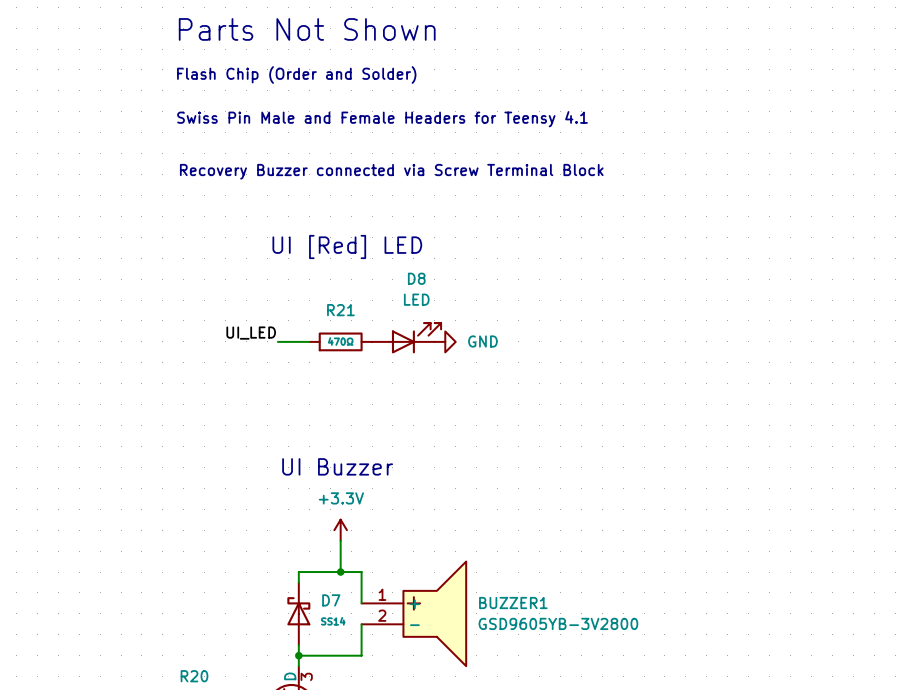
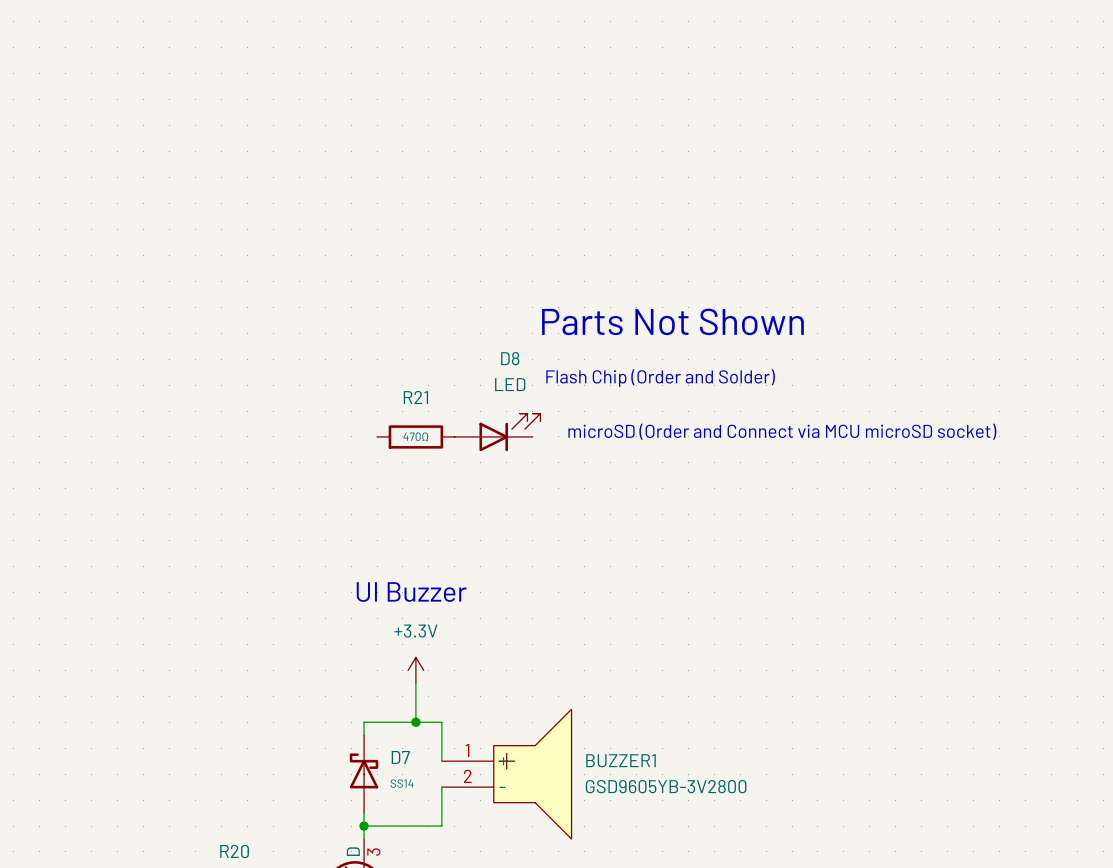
text: Parts Not Shown (307, 29) -> none
text: Flash Chip (Order and Solder) (296, 75) -> none
text: Swiss Pin Male and Female Headers for Teensy 4.1 (382, 119) -> none
text: Recovery Buzzer connected via Screw Terminal Block (391, 171) -> none
text: UI [Red] LED (347, 246) -> none
text: none -> Parts Not Shown (672, 321)
text: none -> Flash Chip (Order and Solder) (660, 378)
label: UI_LED (251, 333) -> none
text: none -> microSD (Order and Connect via MCU microSD socket) (782, 431)
wire: (277, 341) (309, 341) -> none
power symbol: GND (445, 341) -> none

